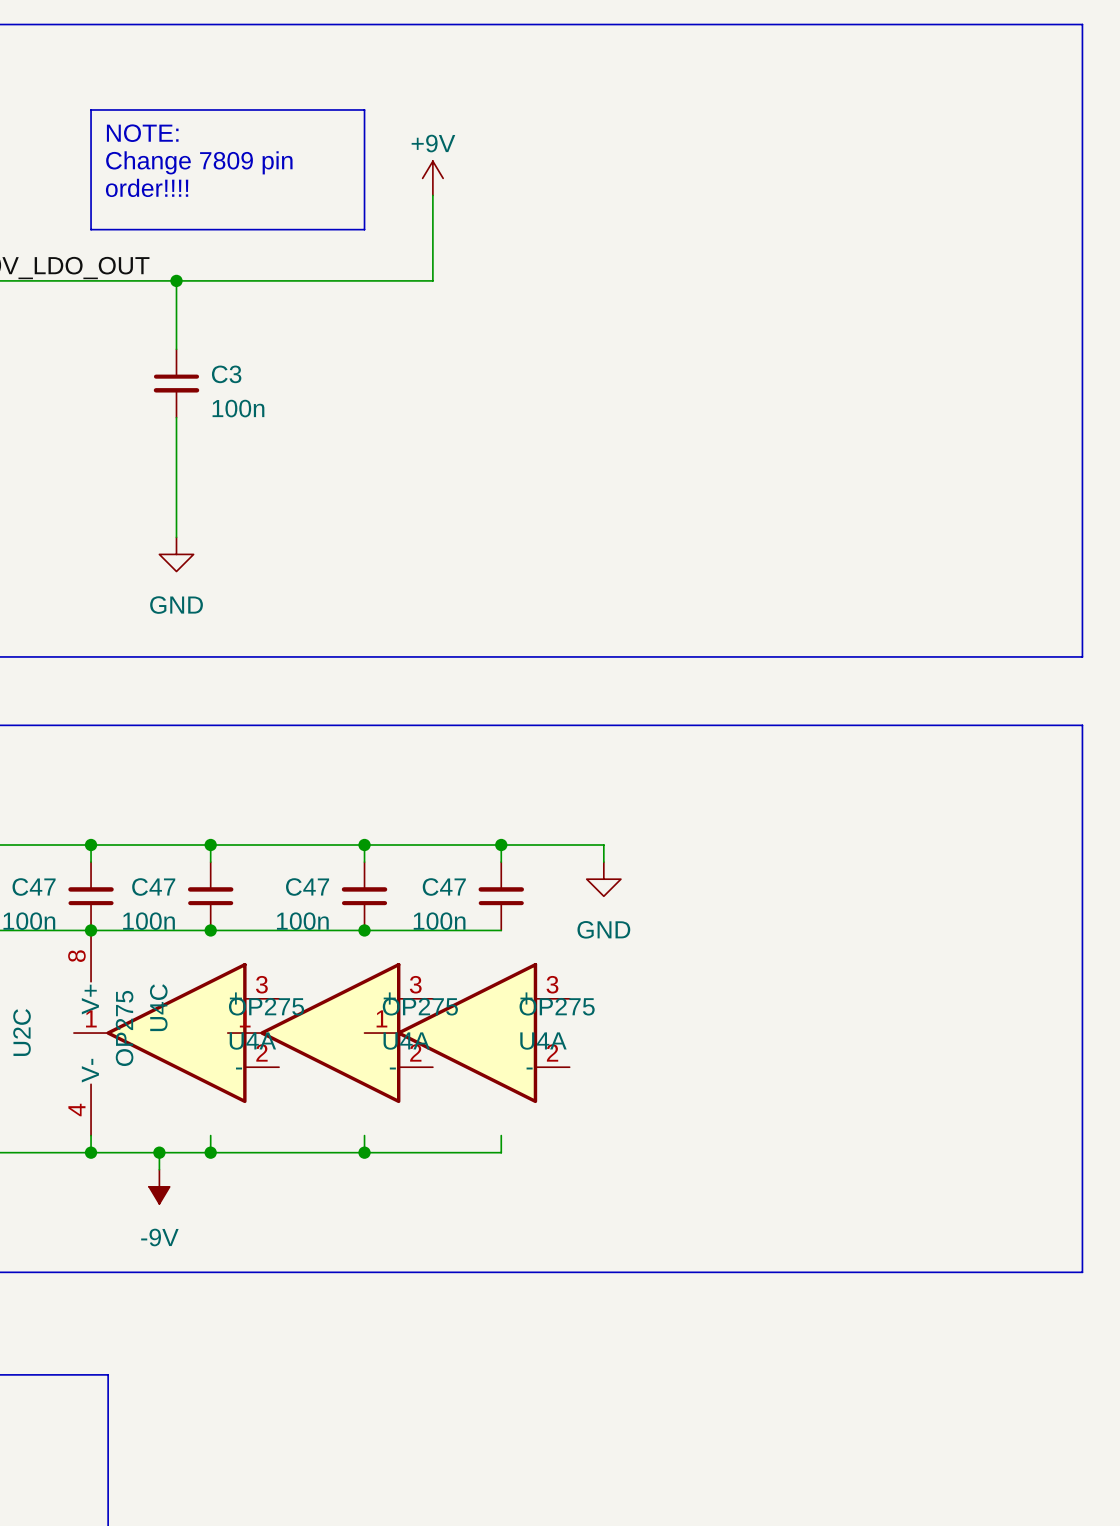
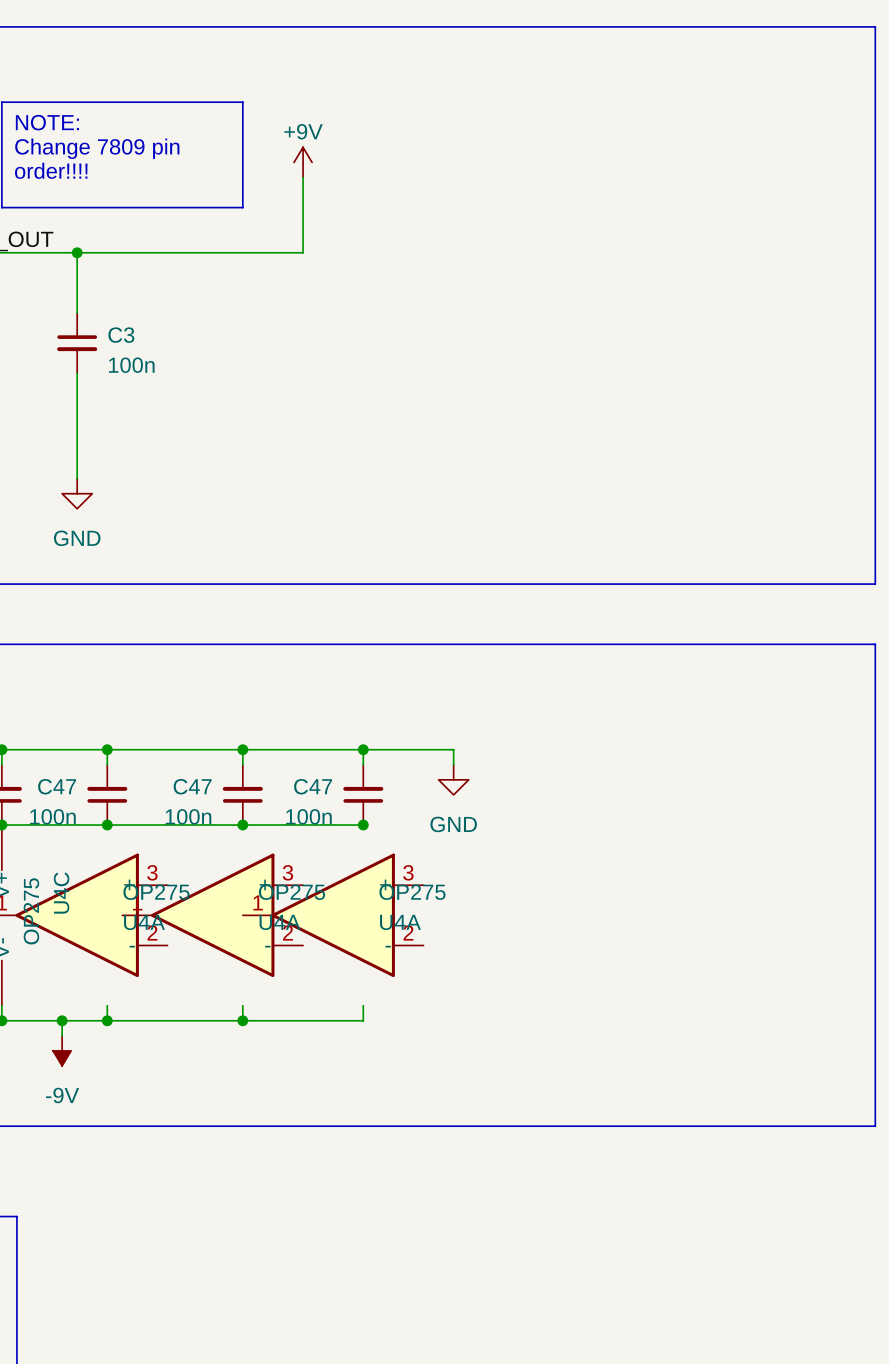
junction: none -> (363, 825)

